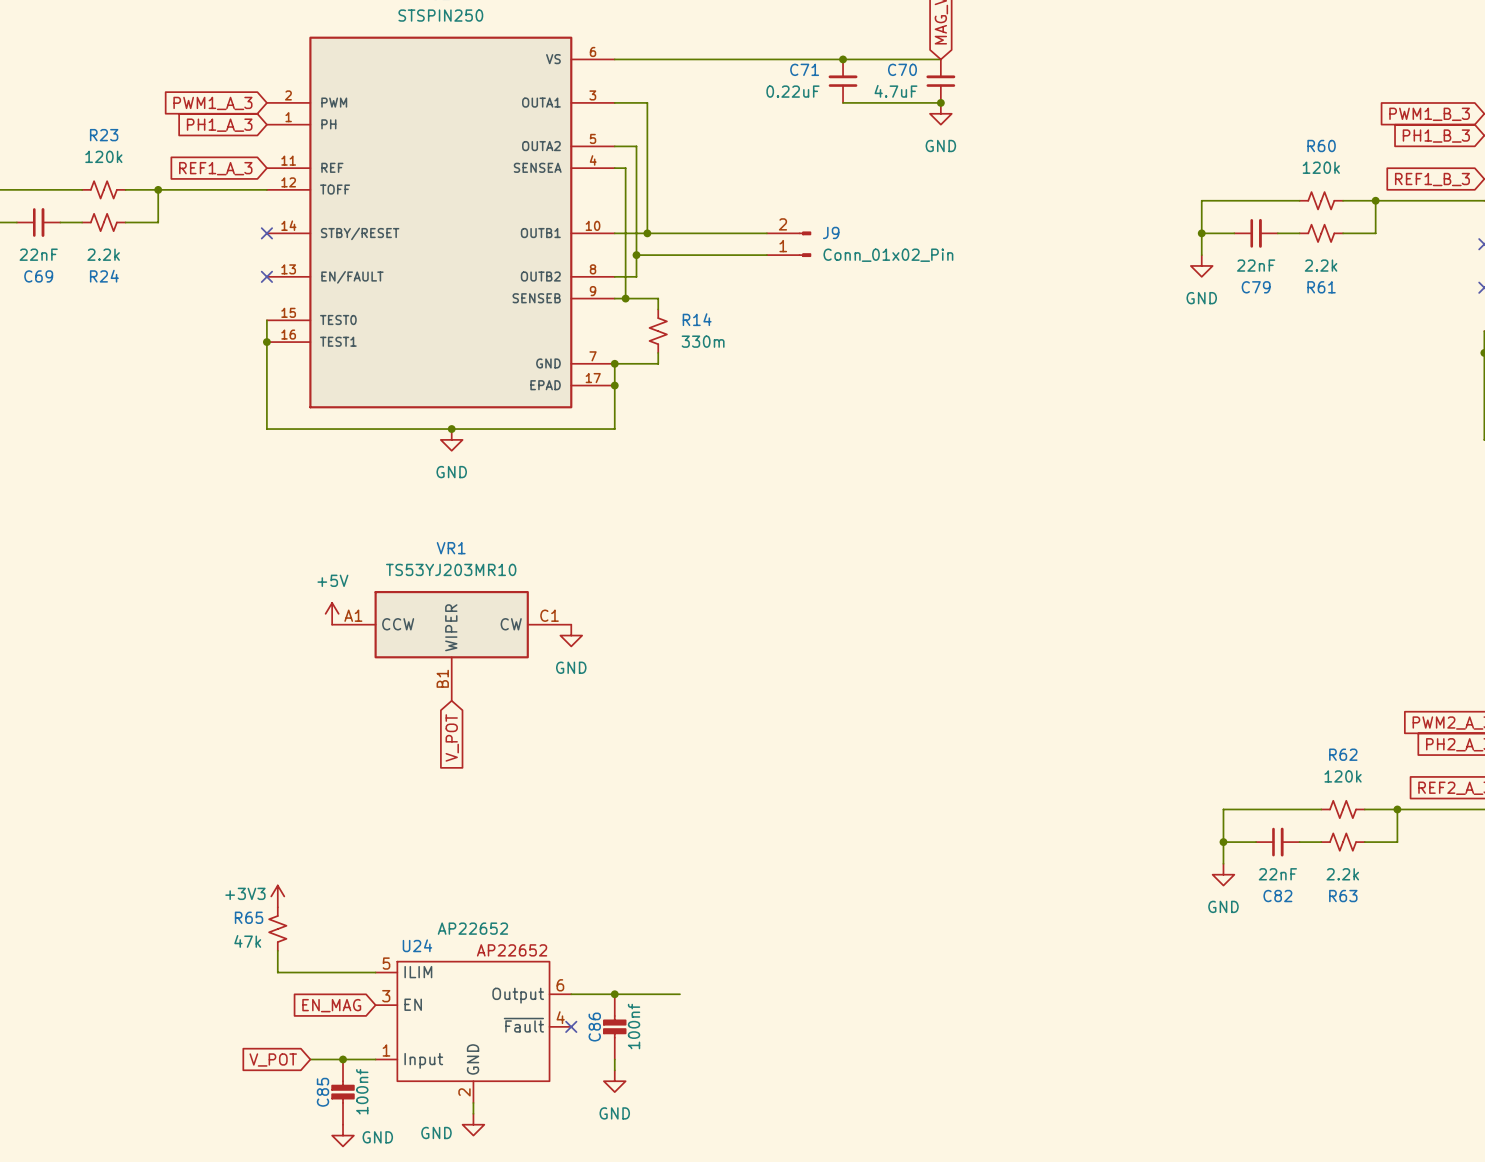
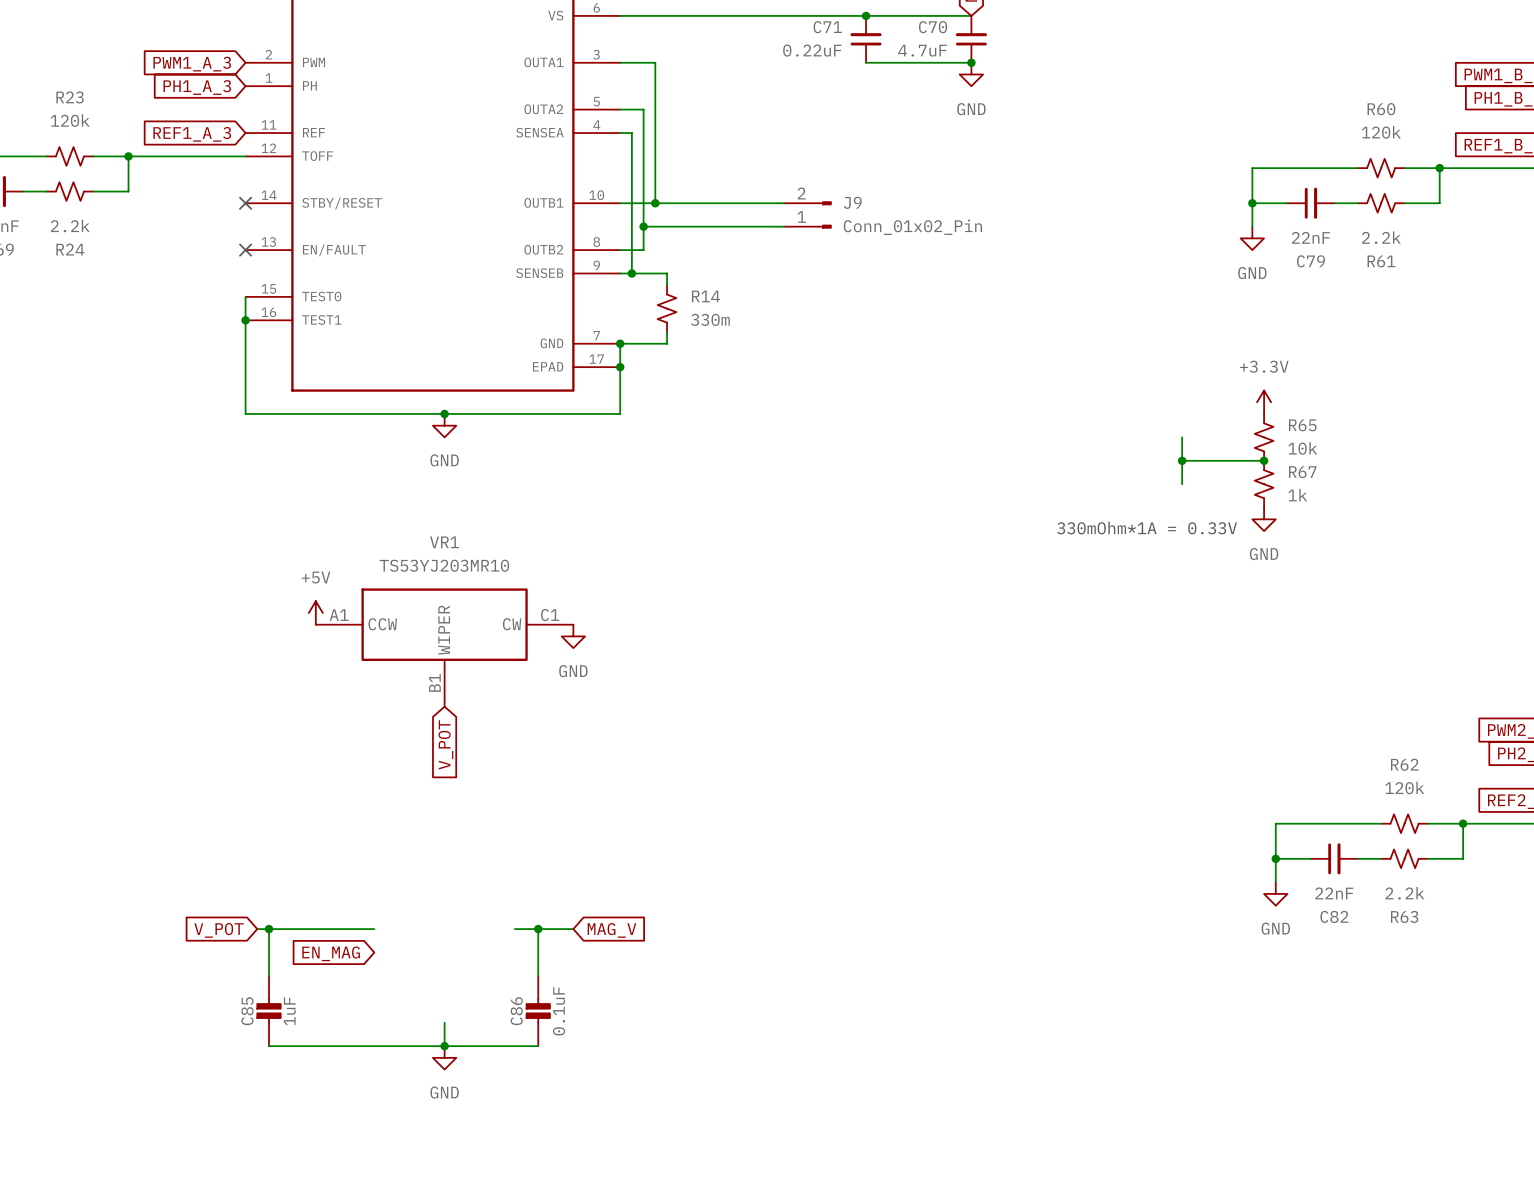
power symbol: none -> +3.3V (1264, 402)
wire: none -> (1182, 437) (1182, 484)
wire: none -> (1182, 460) (1264, 460)
junction: none -> (1182, 460)
junction: none -> (1264, 460)
R67: none -> 1k (1264, 484)
power symbol: none -> GND (1264, 519)
text: none -> 330mOhm*1A = 0.33V (1147, 528)
power symbol: +3V3 (277, 896) -> none
wire: none -> (257, 929) (374, 929)
wire: none -> (269, 929) (269, 975)
junction: none -> (269, 929)
wire: none -> (514, 929) (573, 929)
wire: none -> (538, 929) (538, 975)
junction: none -> (538, 929)
global label: none -> MAG_V (611, 930)
R65 flip: as is (277, 929) -> left-right (1264, 437)
R65 position: (277, 929) -> (1264, 437)
R65 value: 47k (247, 941) -> 10k (1302, 448)
wire: (277, 950) (277, 972) (375, 972) -> none
wire: none -> (444, 1022) (444, 1046)
wire: (571, 994) (679, 994) -> none
junction: (614, 994) -> none
global label position: EN_MAG (331, 1005) -> EN_MAG (331, 953)
wire: none -> (269, 1046) (538, 1046)
junction: none -> (444, 1046)
power symbol: none -> GND (444, 1057)
no-connect mark: (571, 1026) -> none
C86 position: (614, 1026) -> (538, 1011)
C86 value: 100nf (634, 1026) -> 0.1uF (559, 1011)
U24: AP22652 (473, 1032) -> none
wire: (310, 1059) (375, 1059) -> none
junction: (343, 1059) -> none
wire: (614, 1059) (614, 1070) -> none
global label position: V_POT (273, 1060) -> V_POT (219, 930)
power symbol: GND (614, 1081) -> none
C85 value: 100nf (362, 1091) -> 1uF (289, 1011)
C85 position: (343, 1092) -> (269, 1011)
wire: (473, 1102) (473, 1113) -> none
power symbol: GND (473, 1124) -> none
power symbol: GND (343, 1135) -> none

